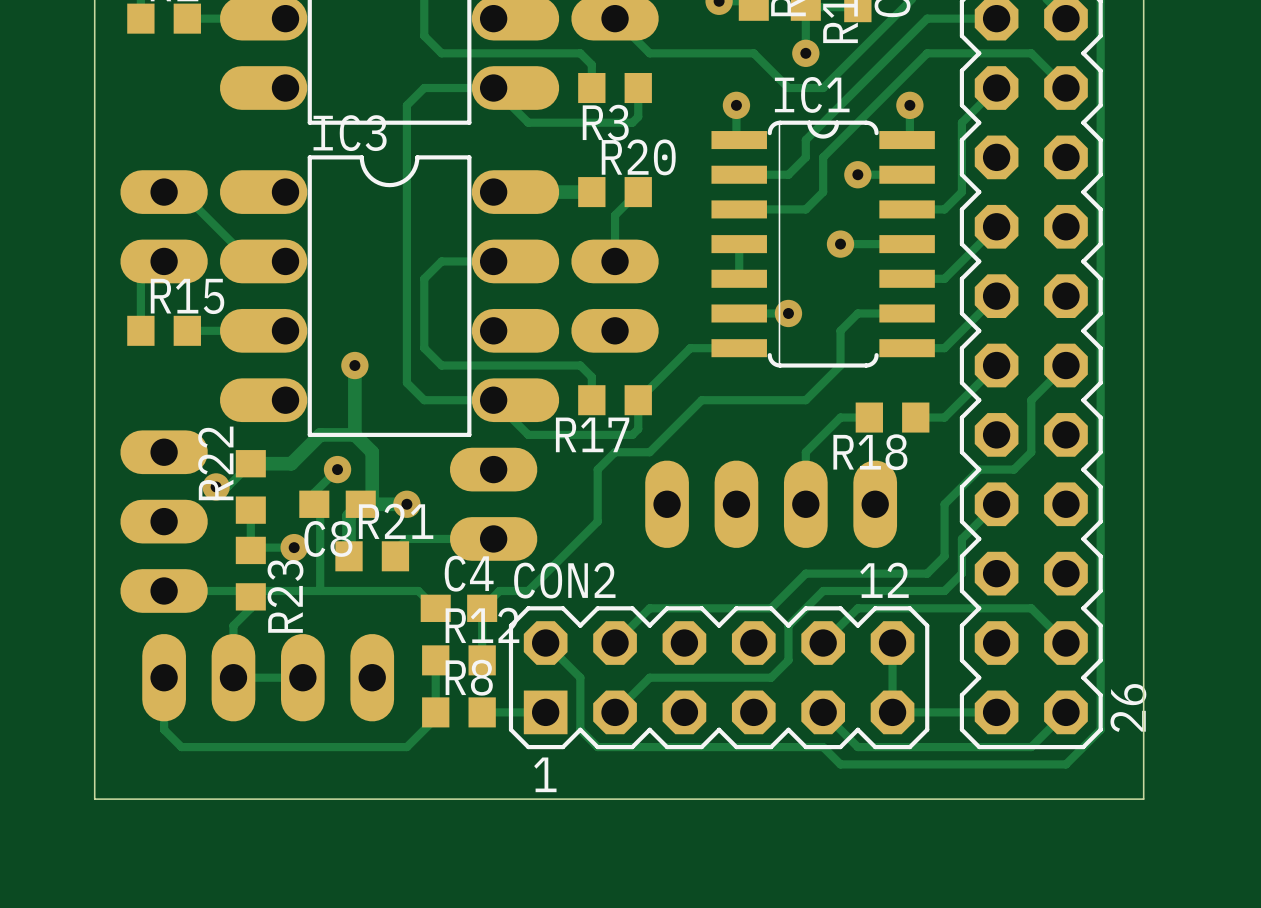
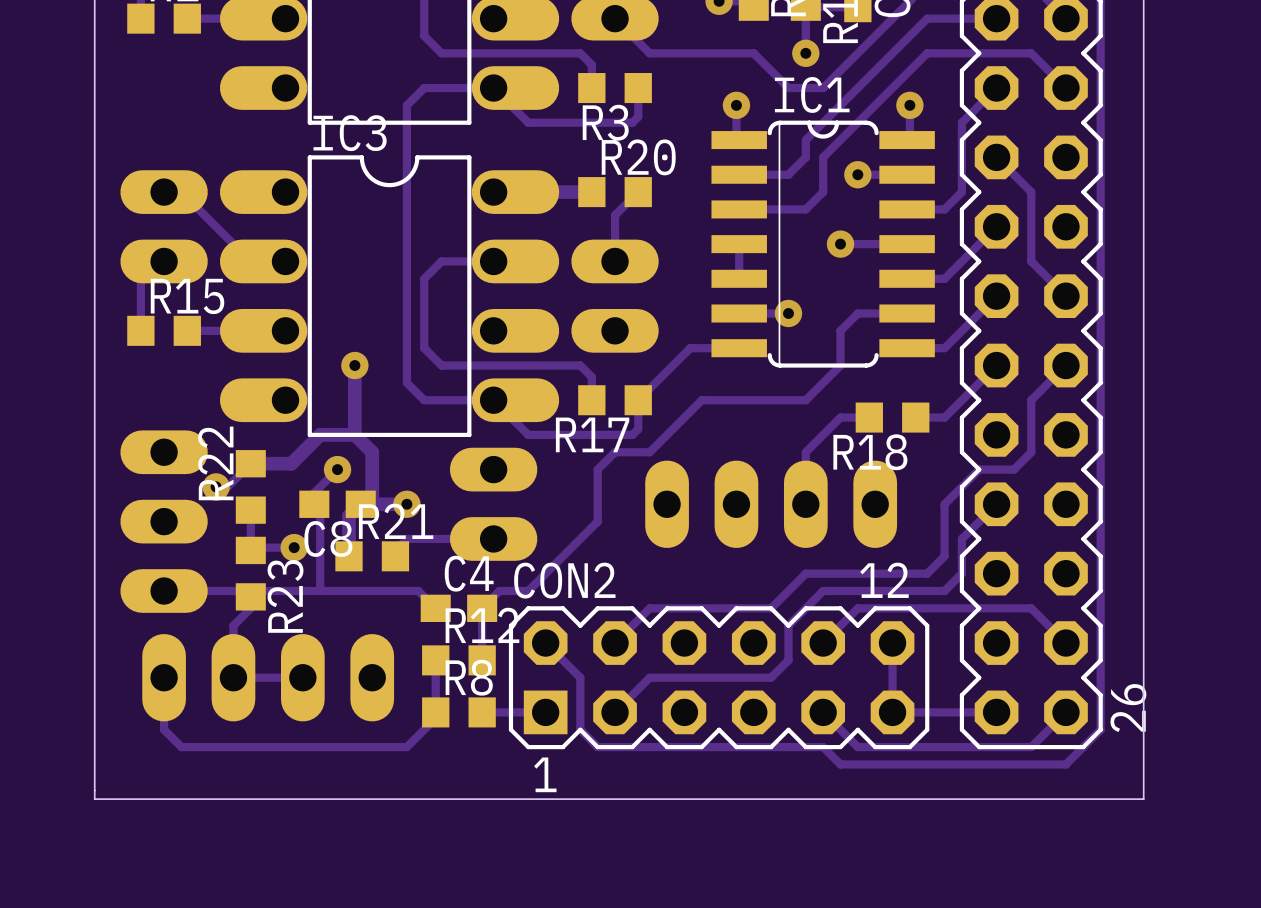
track: none -> (996, 157) (1031, 192) (1031, 261) (1065, 296)

